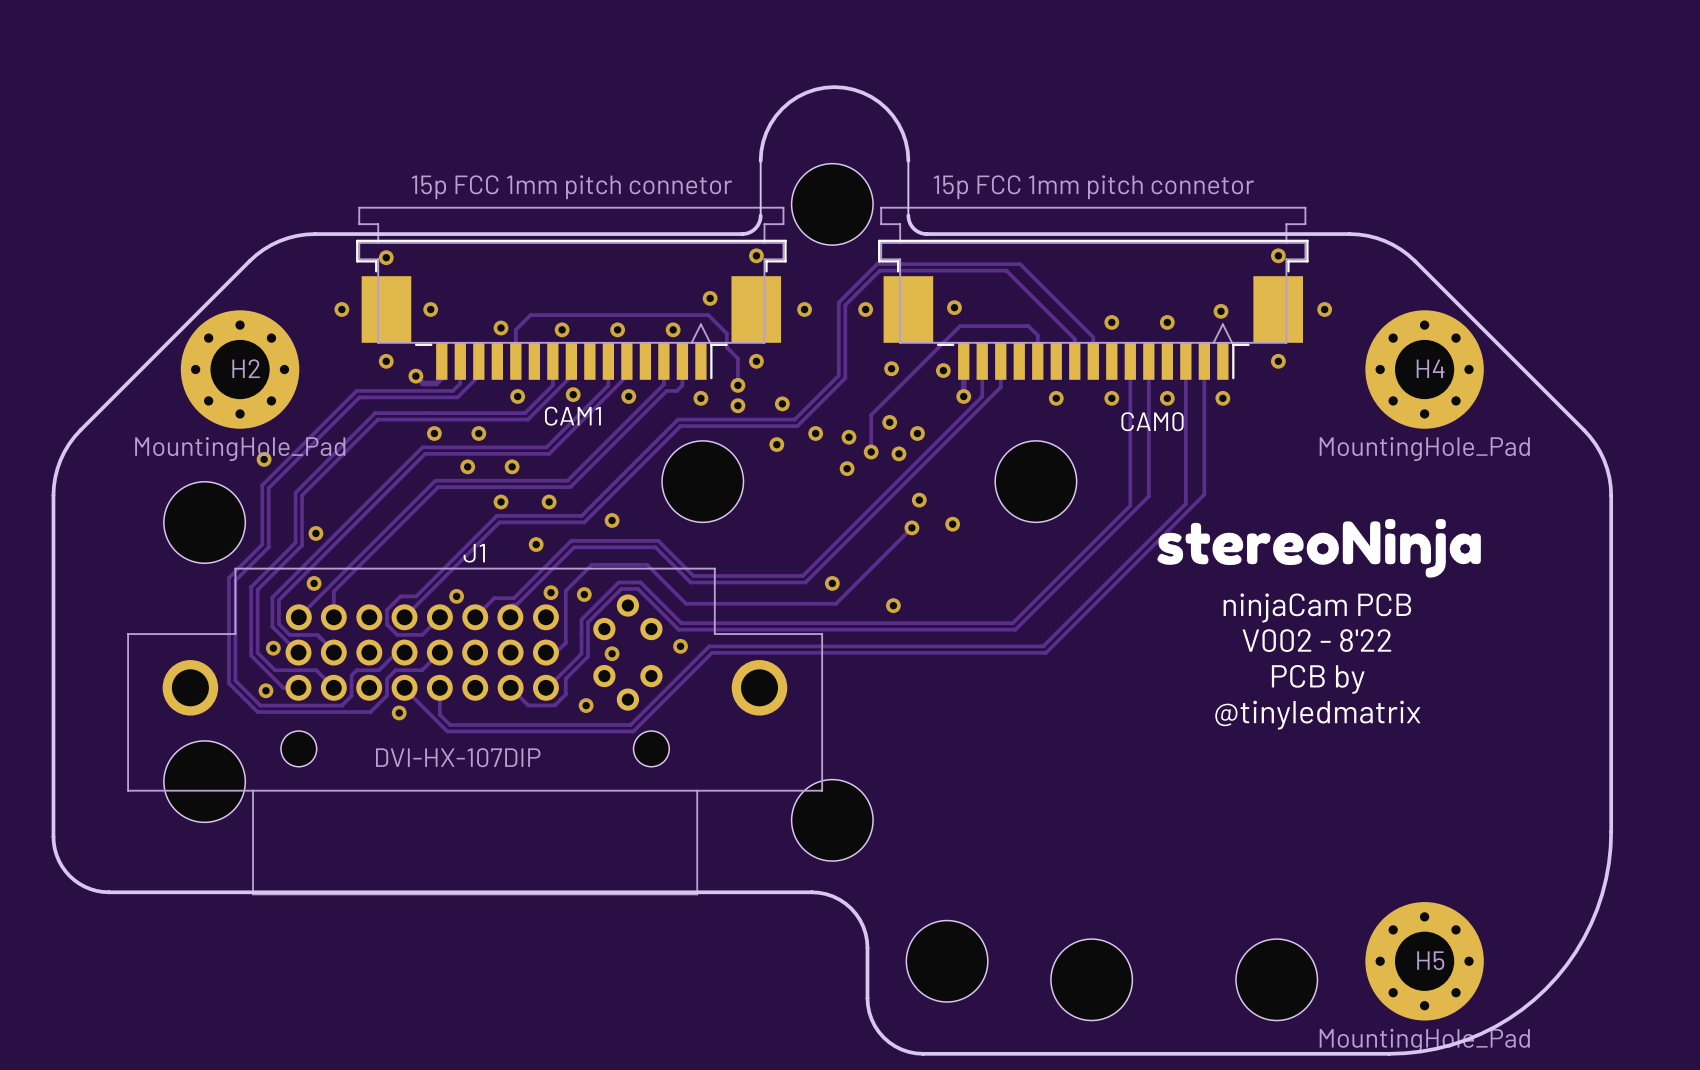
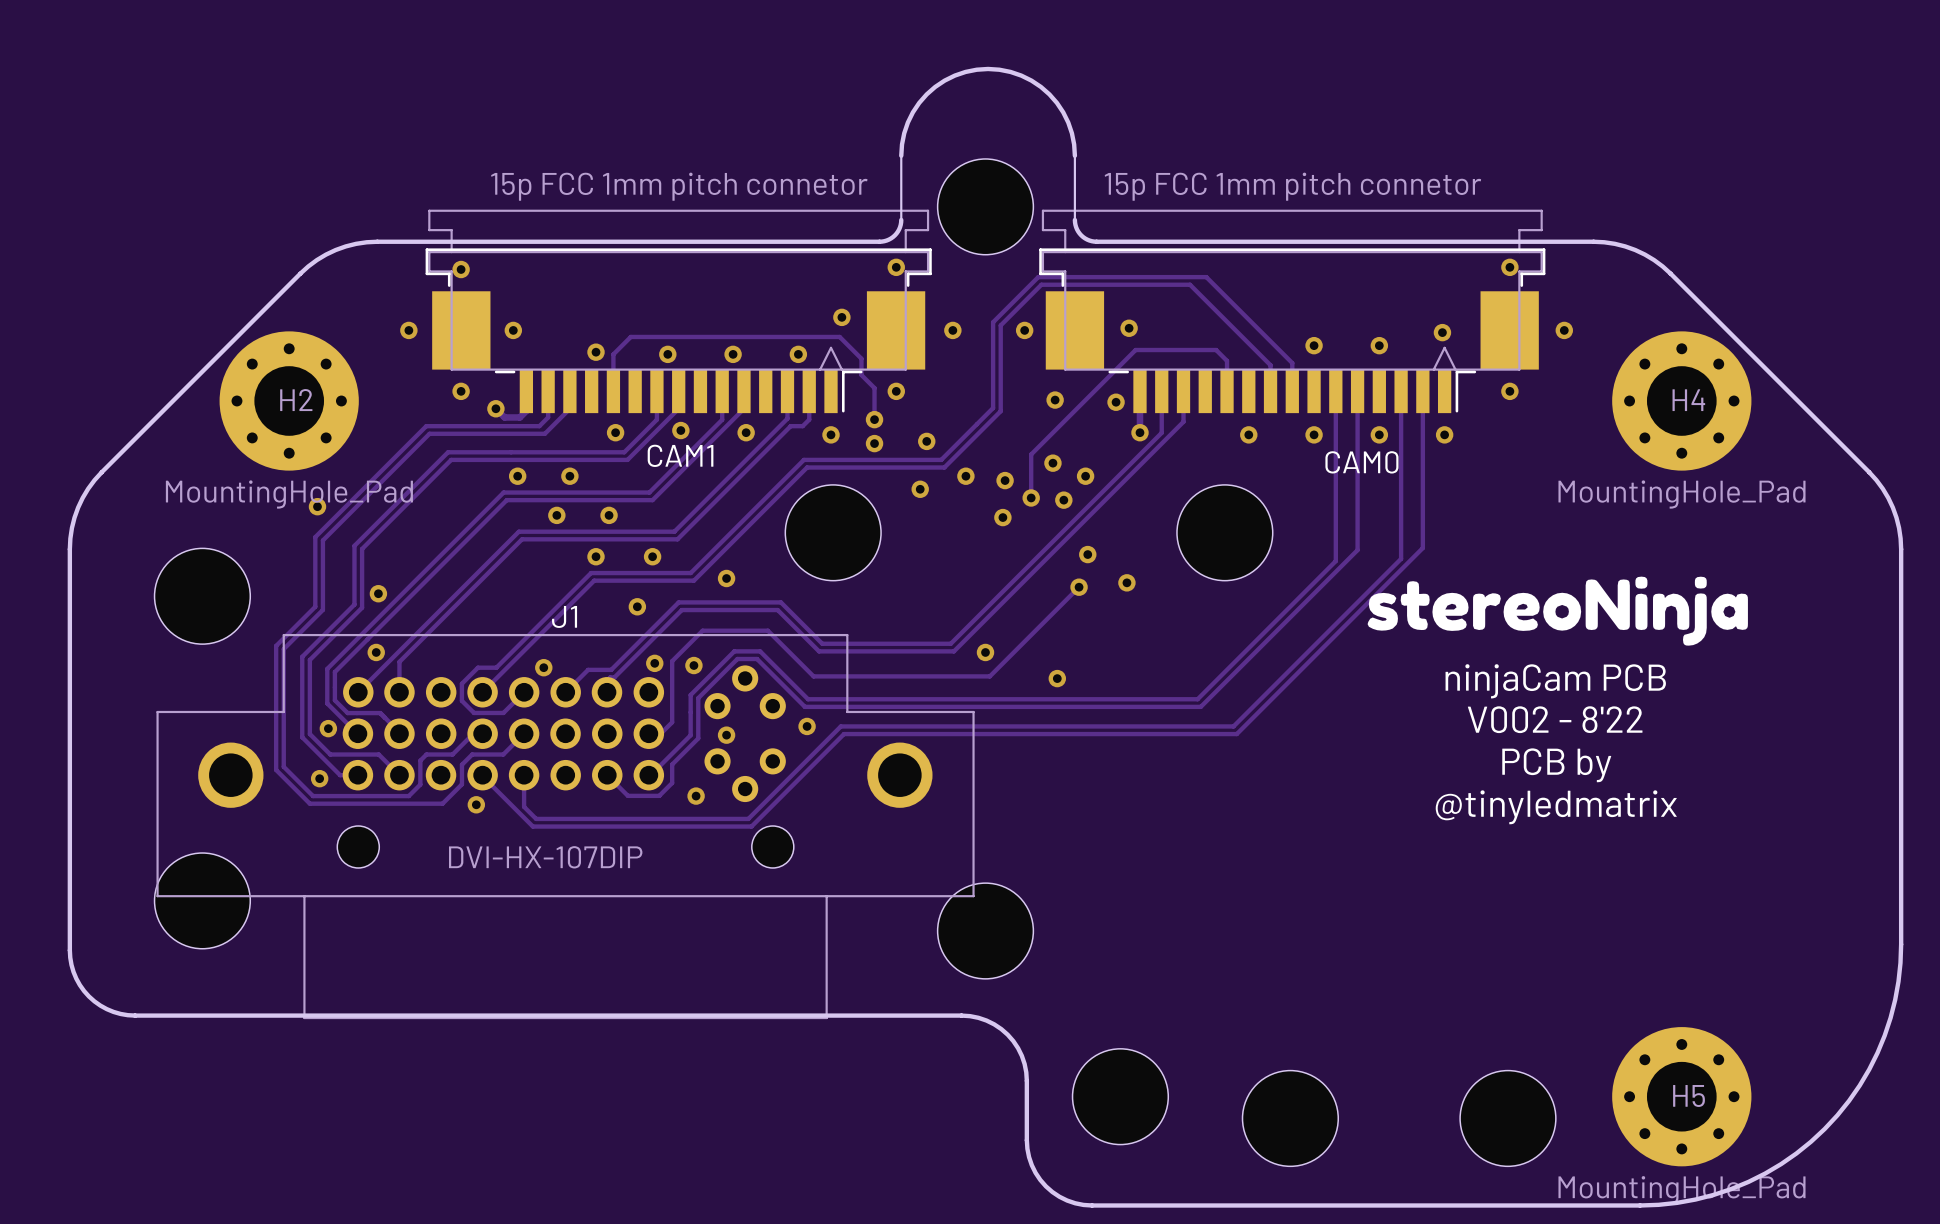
part position: (204, 522) -> (202, 596)
part position: (204, 781) -> (202, 900)

